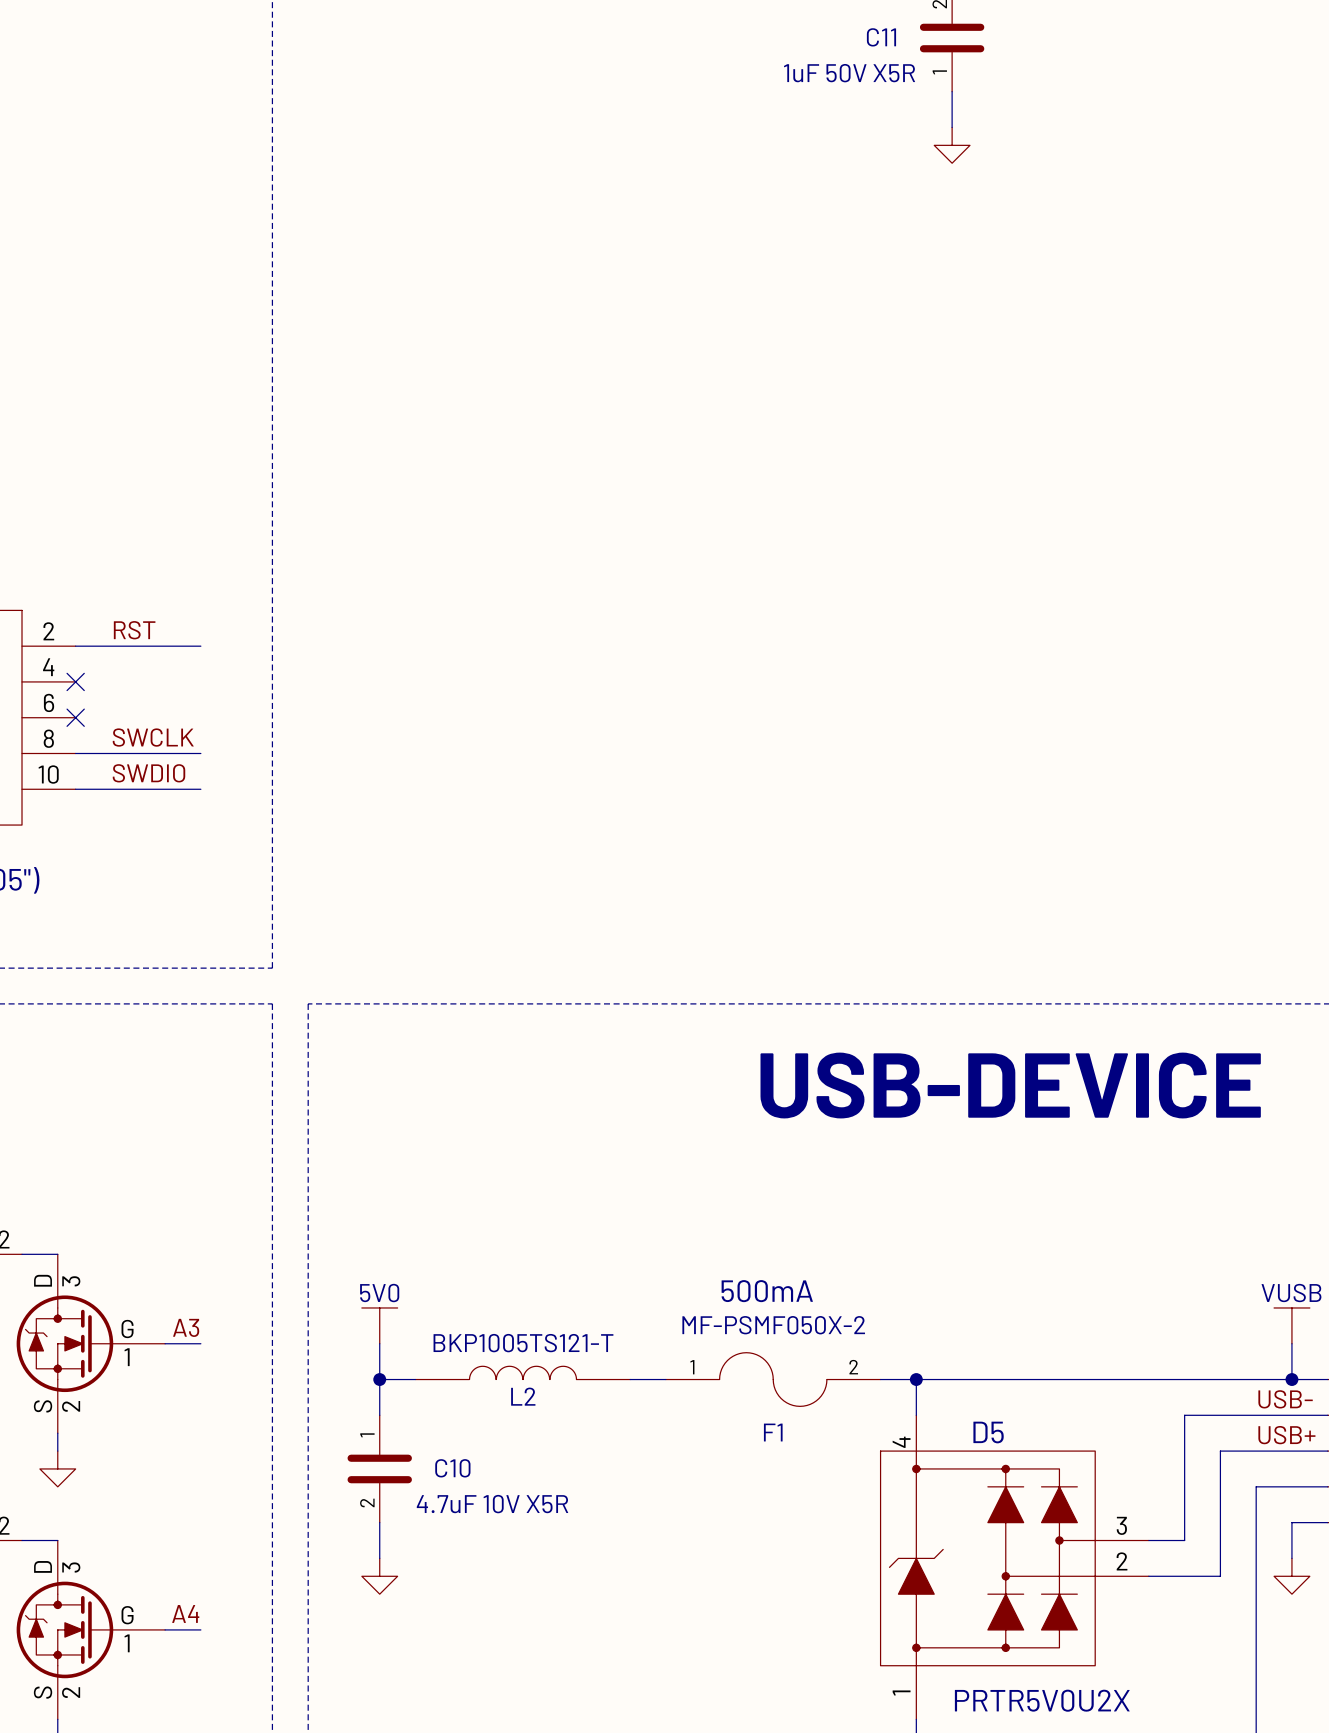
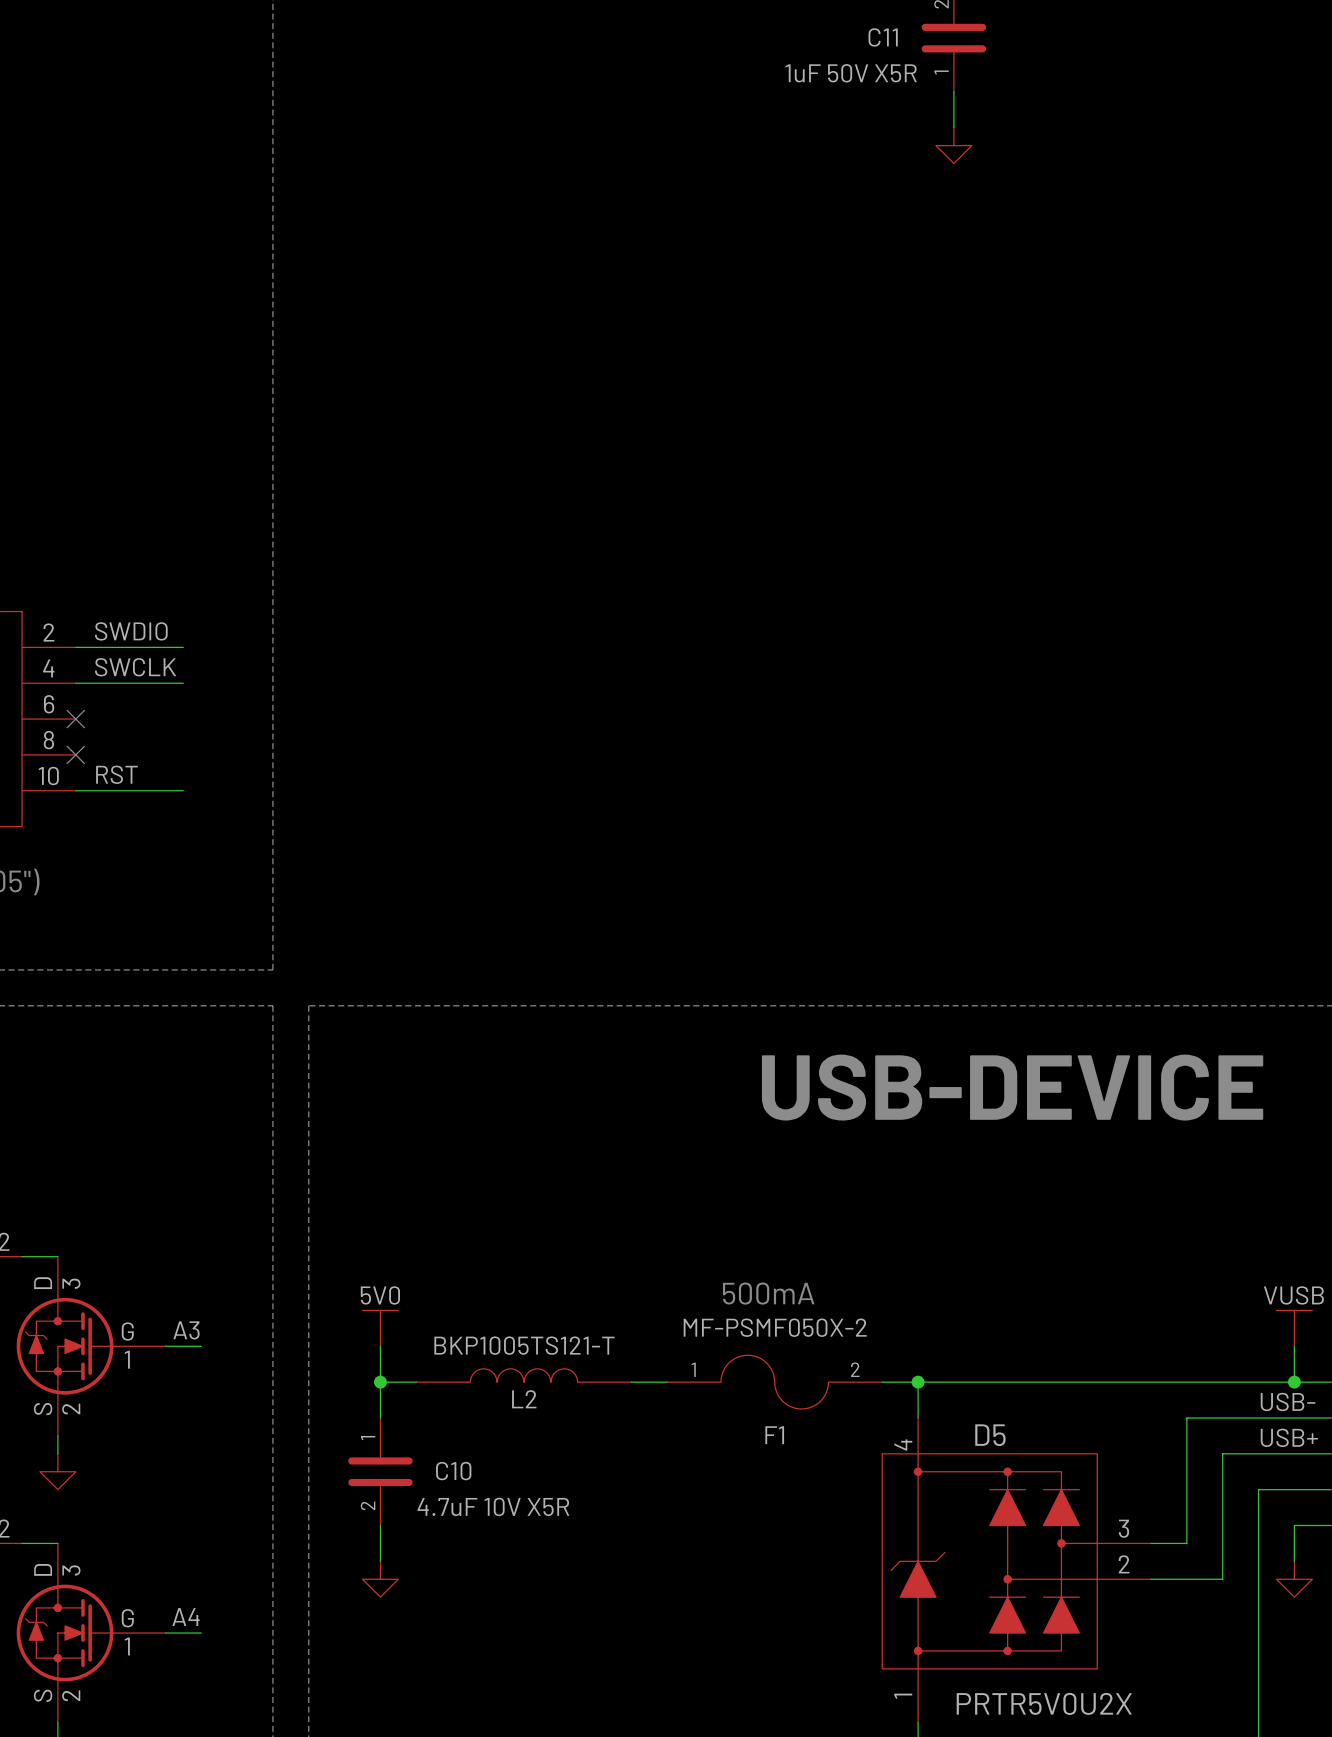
label position: RST (134, 630) -> RST (116, 774)
wire: (182, 646) (200, 646) -> none
wire: none -> (75, 683) (183, 683)
no-connect mark position: (75, 681) -> (75, 754)
label position: SWCLK (153, 737) -> SWCLK (135, 667)
wire: (75, 753) (200, 753) -> none
label position: SWDIO (149, 773) -> SWDIO (131, 631)
wire: (182, 789) (200, 789) -> none

